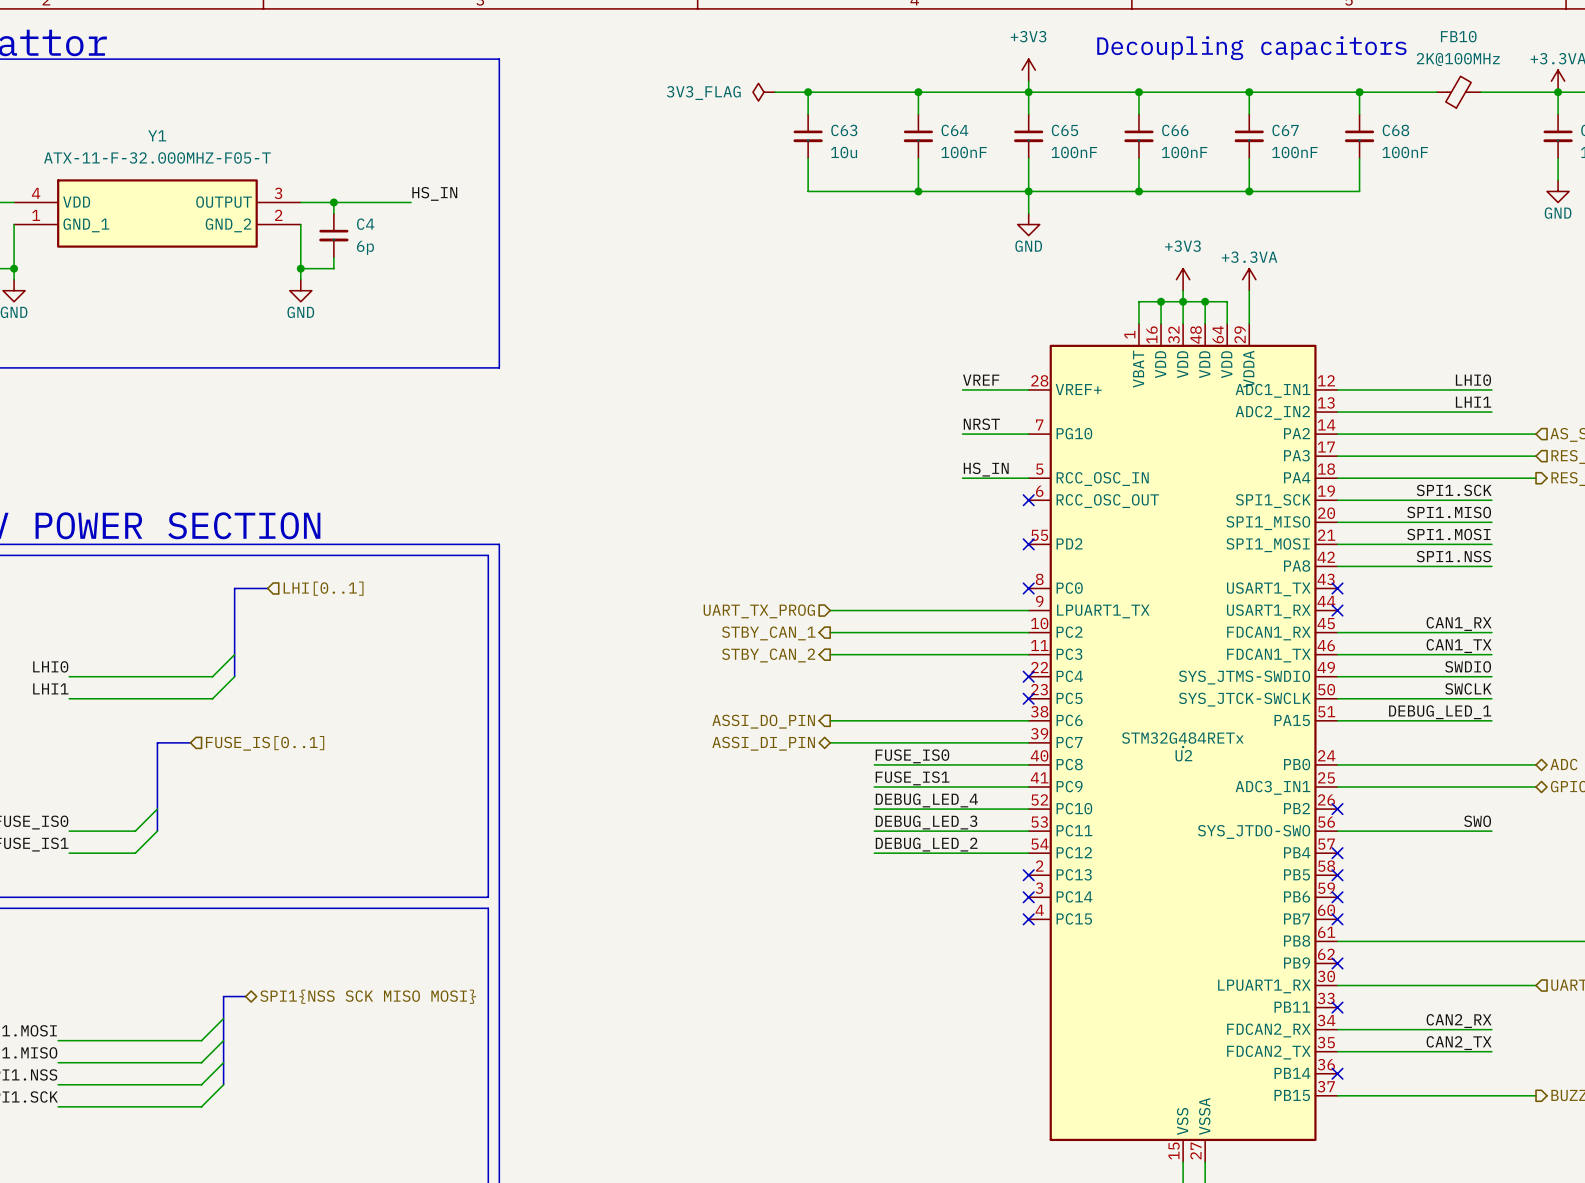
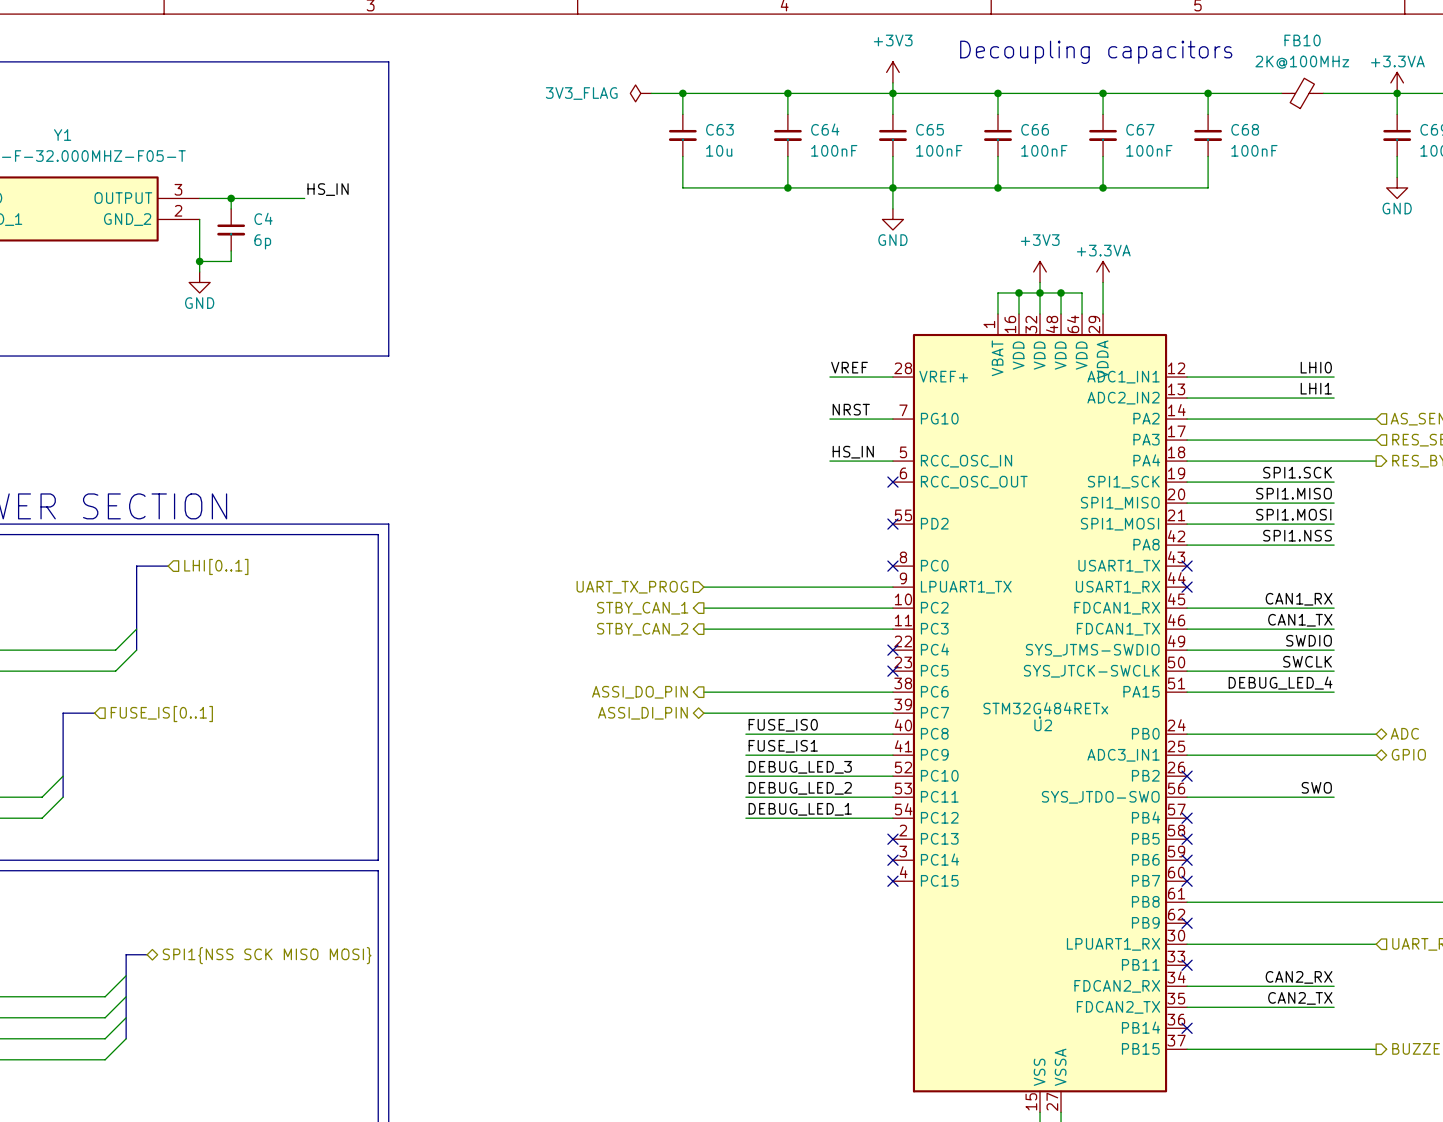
label: DEBUG_LED_1 (1440, 712) -> DEBUG_LED_4 (1280, 683)
label: DEBUG_LED_4 (926, 800) -> DEBUG_LED_3 (800, 767)
label: DEBUG_LED_3 (926, 822) -> DEBUG_LED_2 (800, 788)
label: DEBUG_LED_2 (926, 844) -> DEBUG_LED_1 (800, 809)

